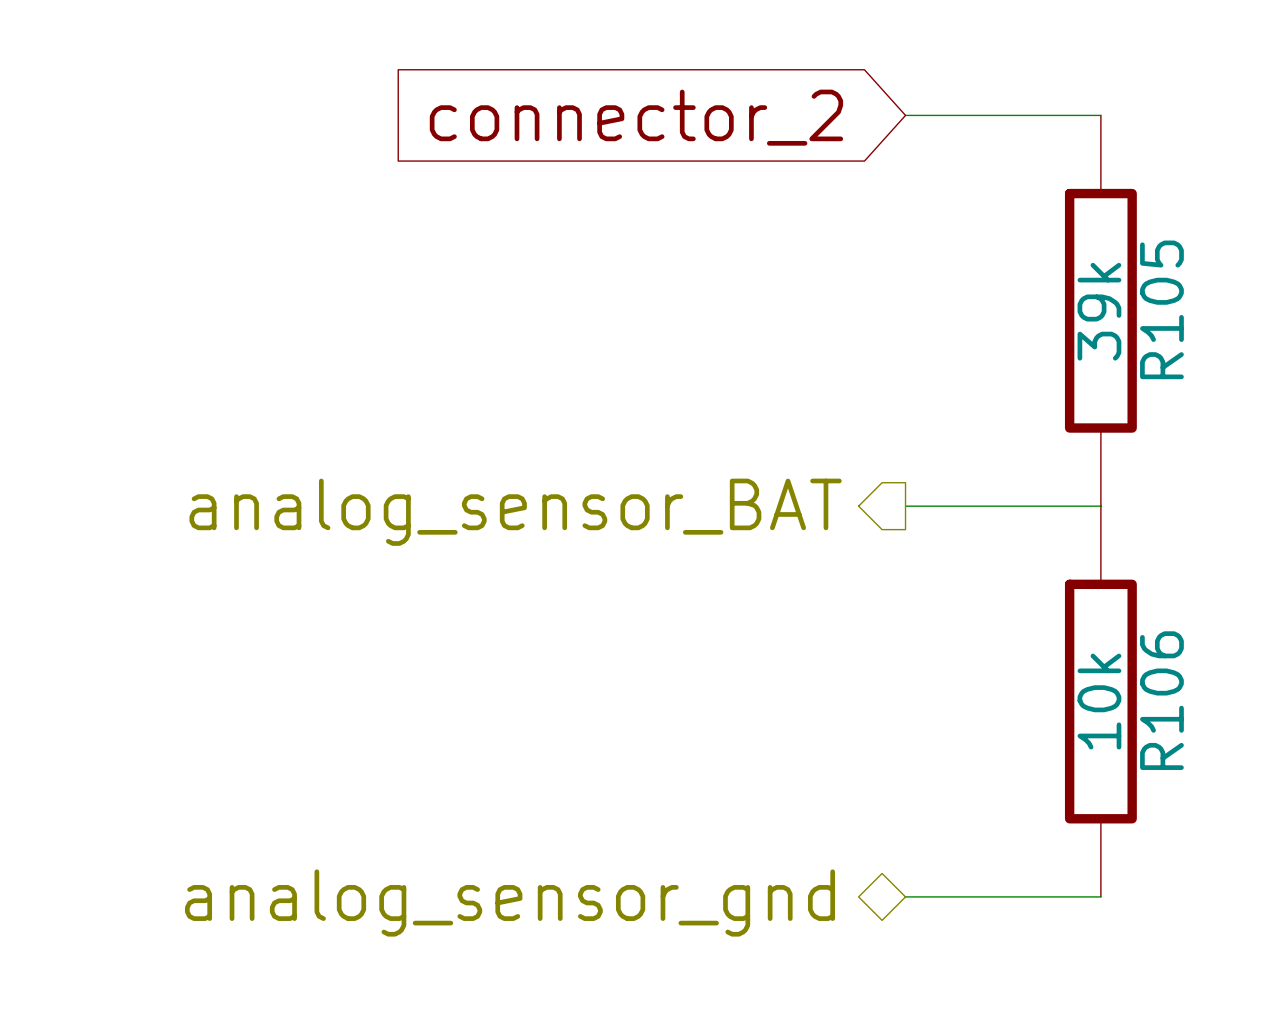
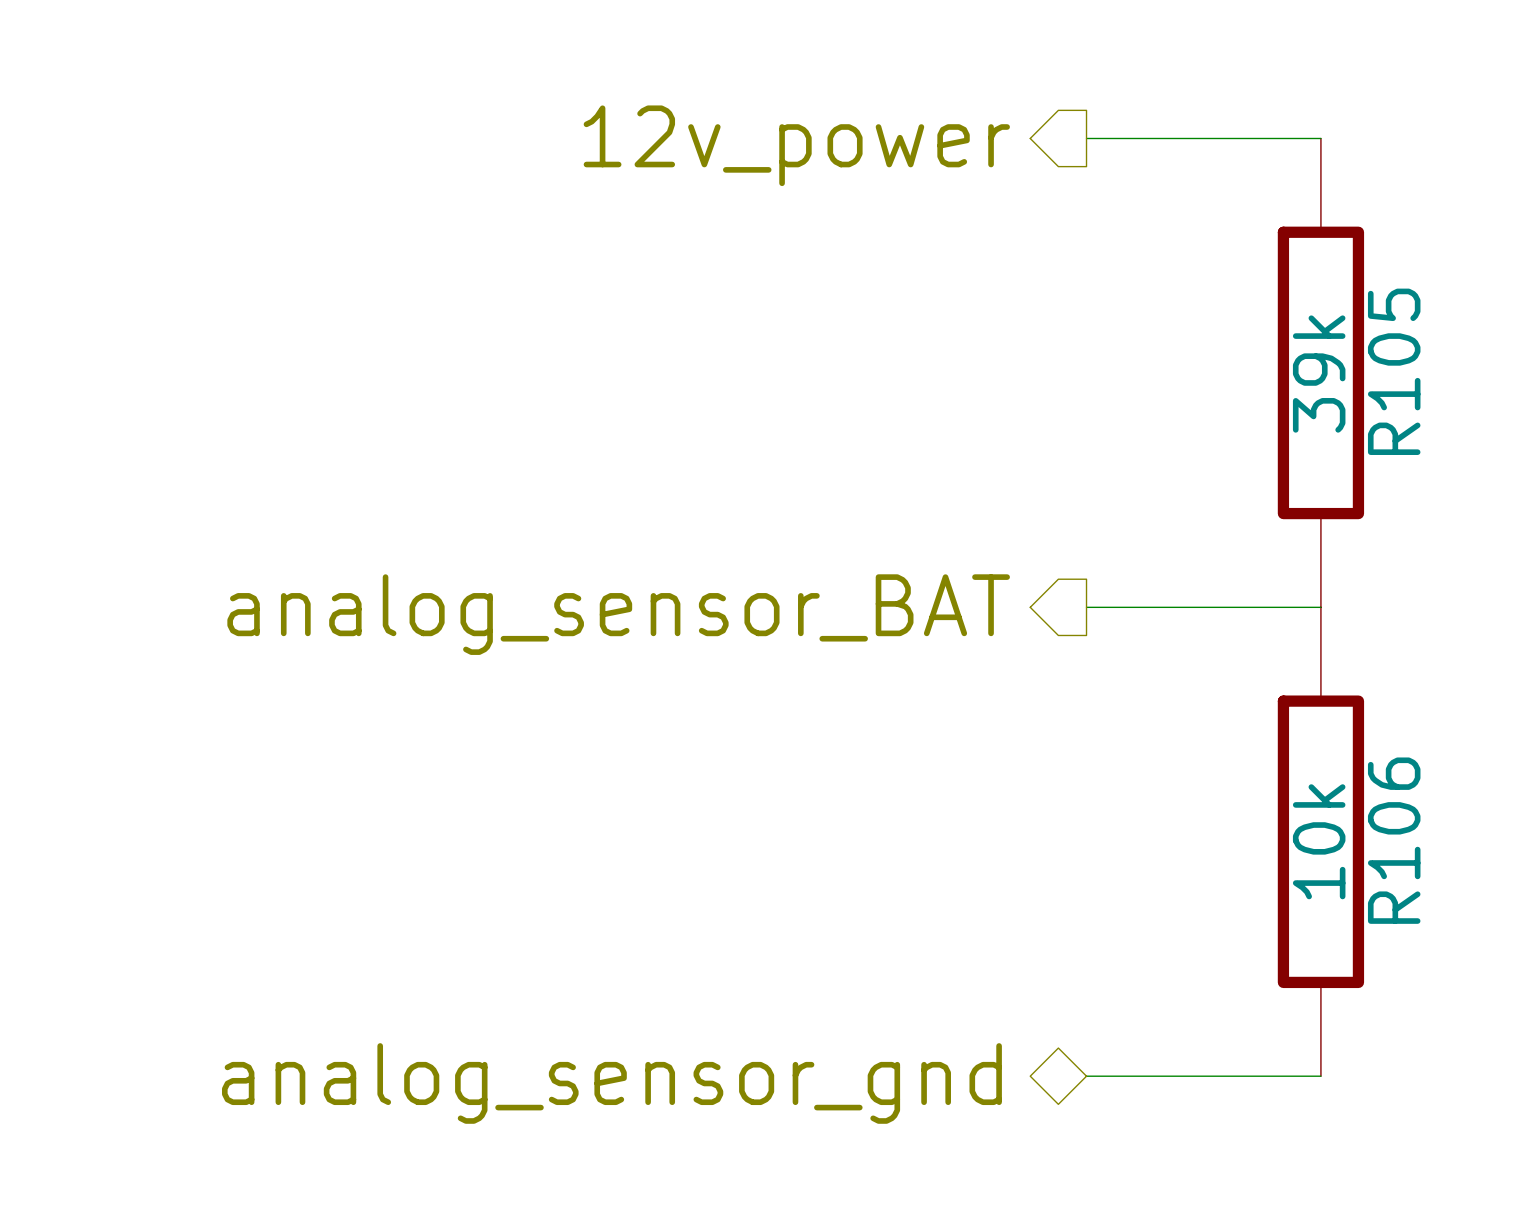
global label: connector_2 (636, 117) -> none
hierarchical label: none -> 12v_power (796, 145)

